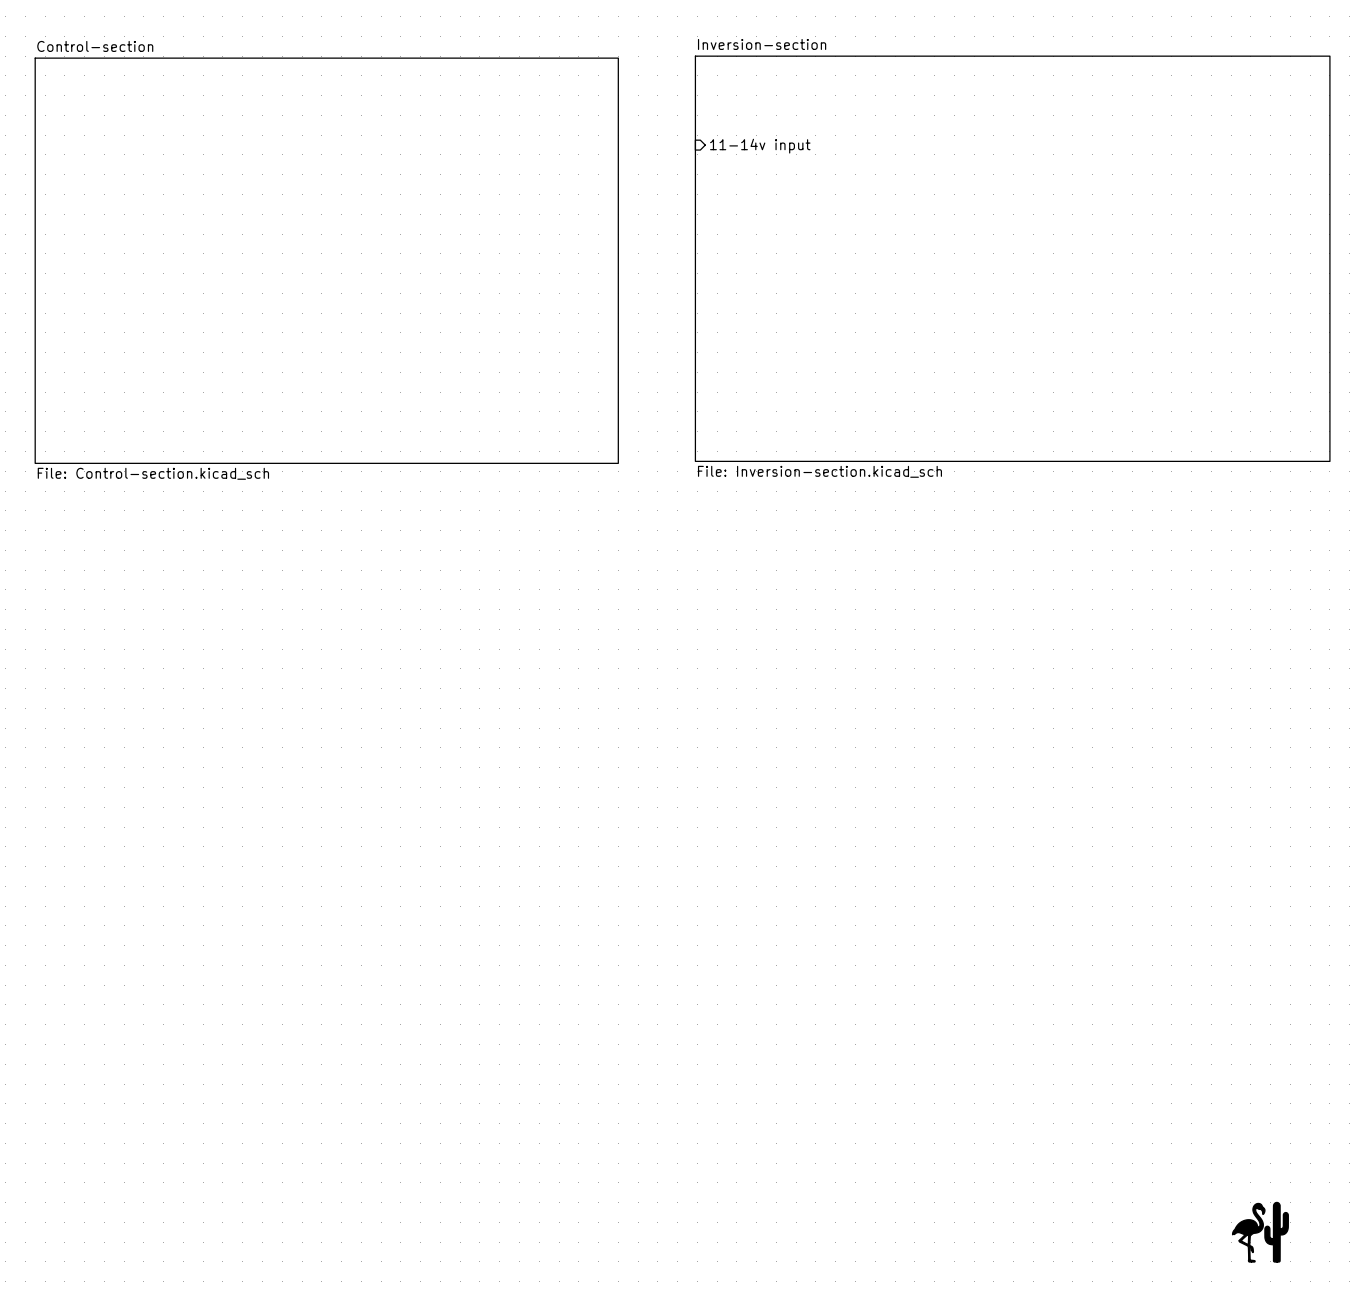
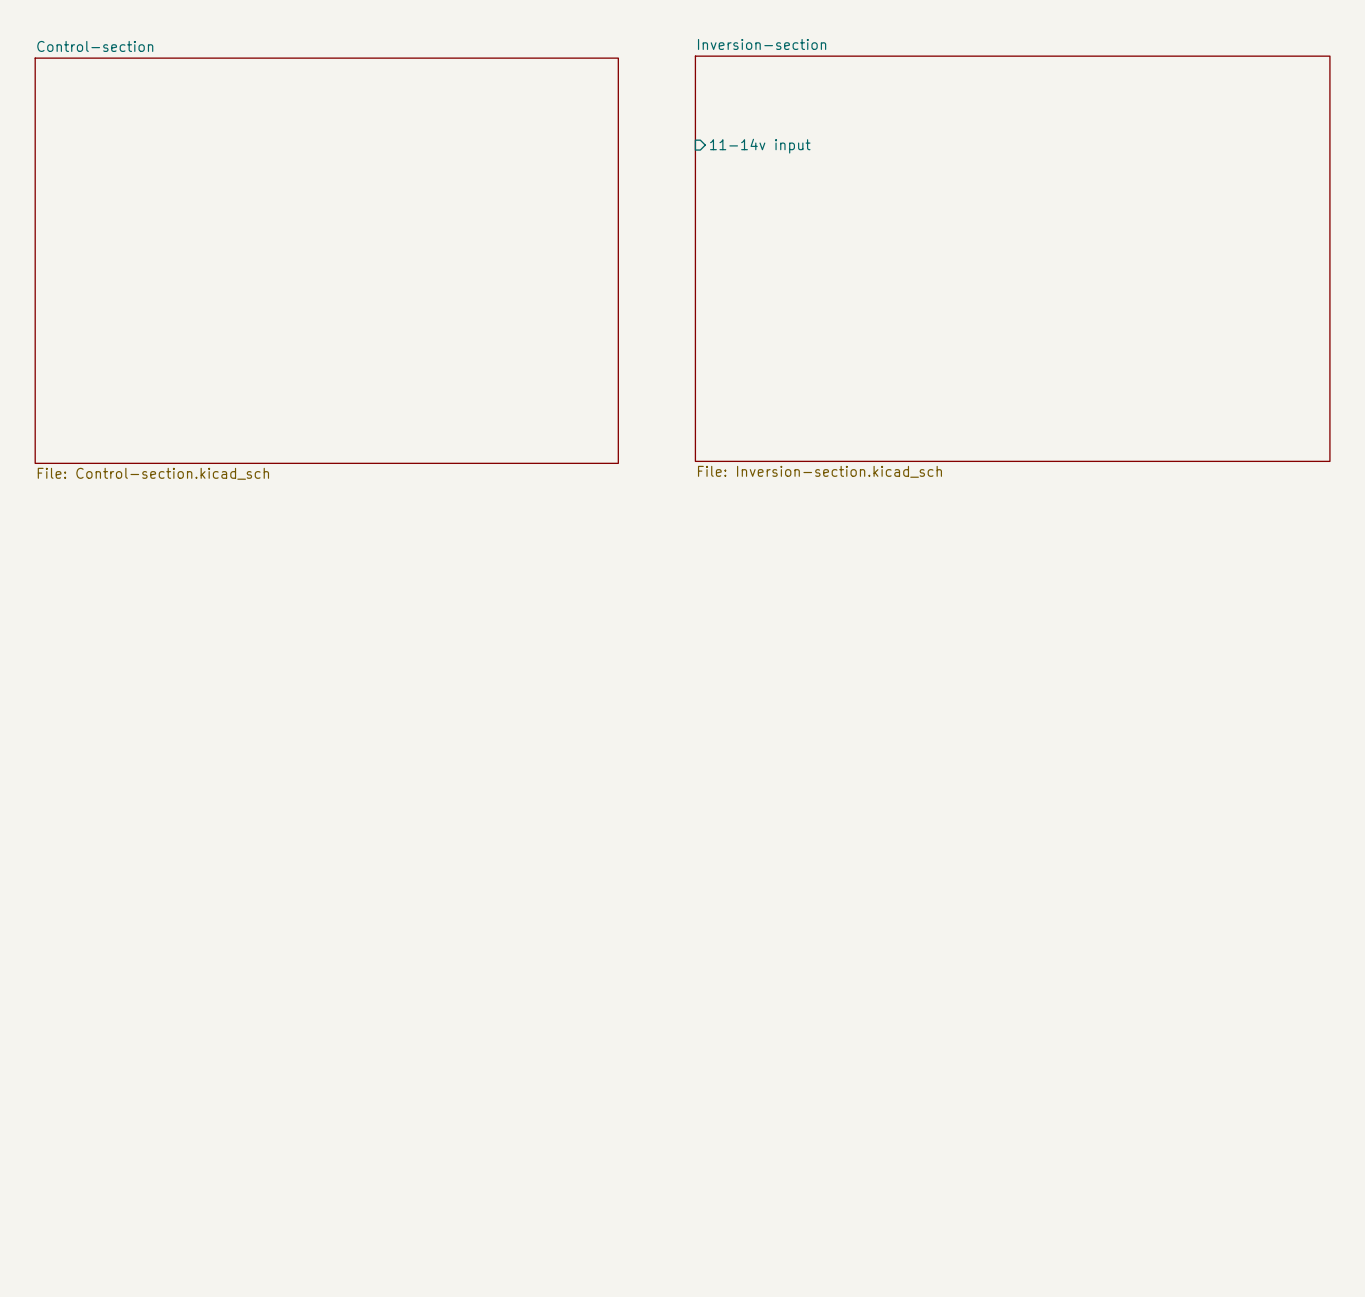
power symbol: (1260, 1232) -> none

